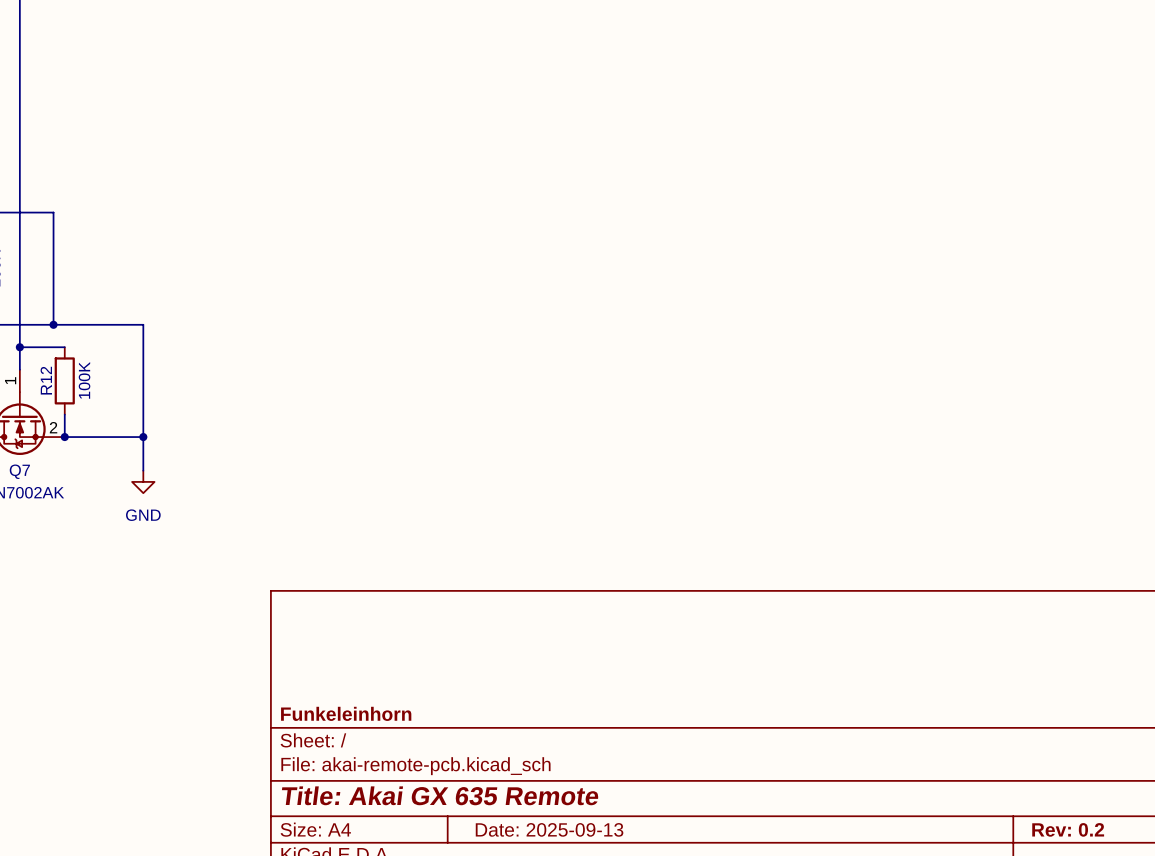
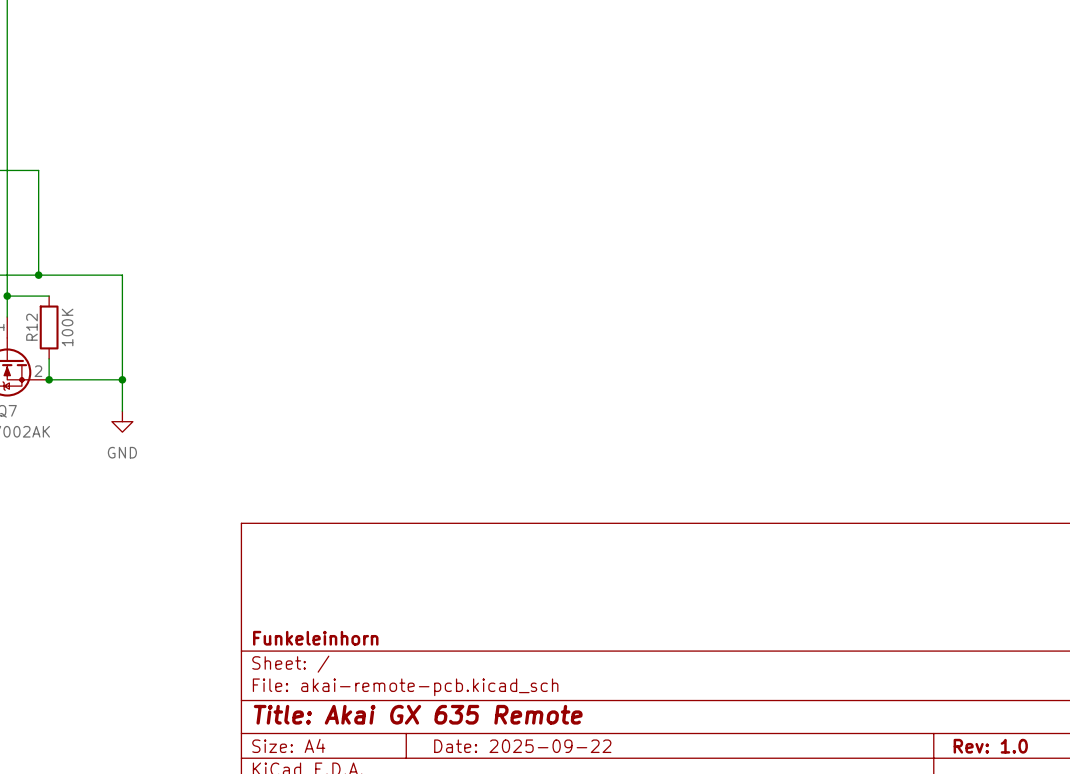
title block: Date: 2025-09-13 (549, 829) -> Date: 2025-09-22 (522, 746)
title block: Rev: 0.2 (1068, 829) -> Rev: 1.0 (990, 746)

